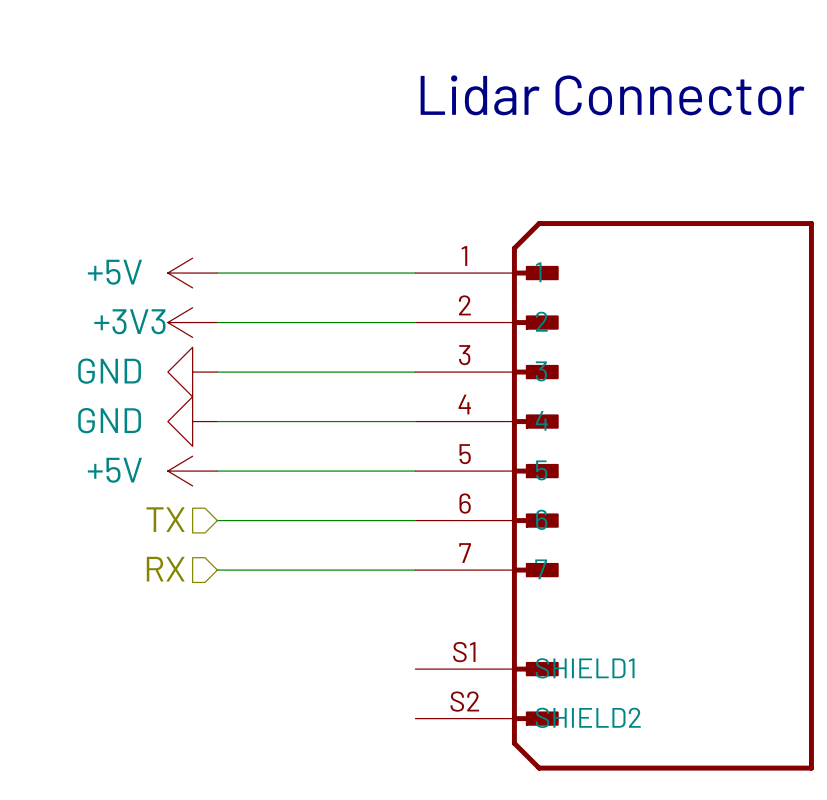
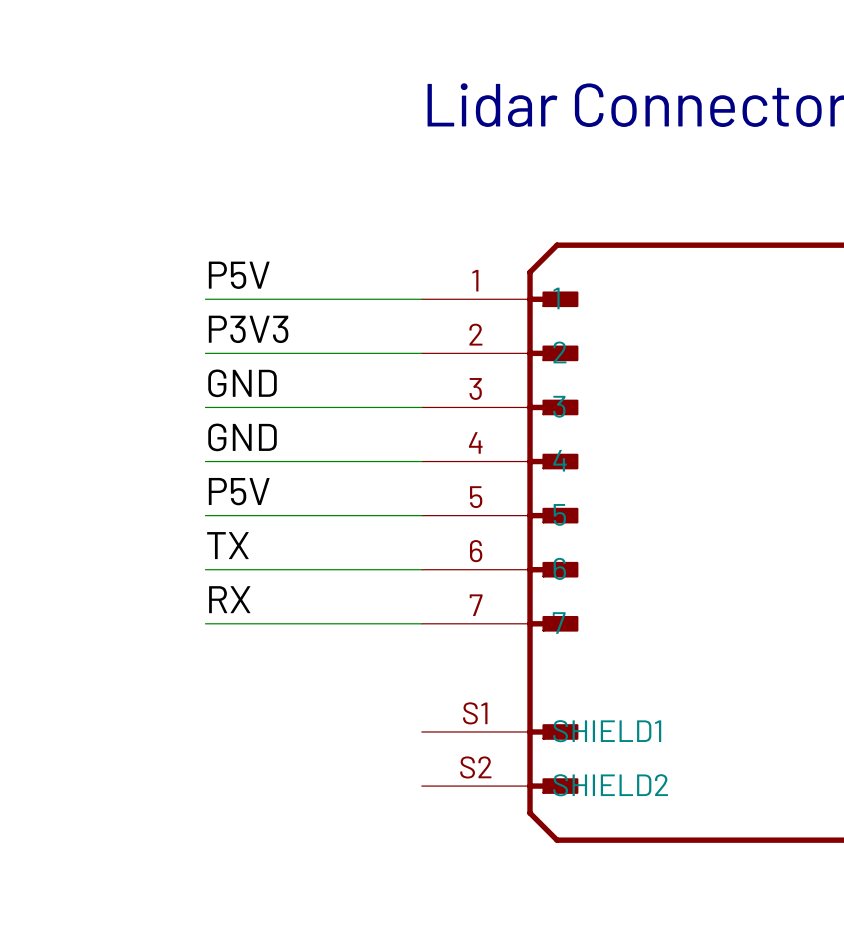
label: none -> P5V (239, 275)
power symbol: +5V (192, 273) -> none
label: none -> P3V3 (248, 329)
power symbol: +3V3 (192, 322) -> none
label: none -> GND (242, 383)
power symbol: GND (192, 372) -> none
label: none -> GND (242, 437)
power symbol: GND (192, 421) -> none
label: none -> P5V (239, 491)
power symbol: +5V (192, 471) -> none
label: none -> TX (227, 545)
hierarchical label: TX (165, 519) -> none
label: none -> RX (229, 599)
hierarchical label: RX (165, 569) -> none

